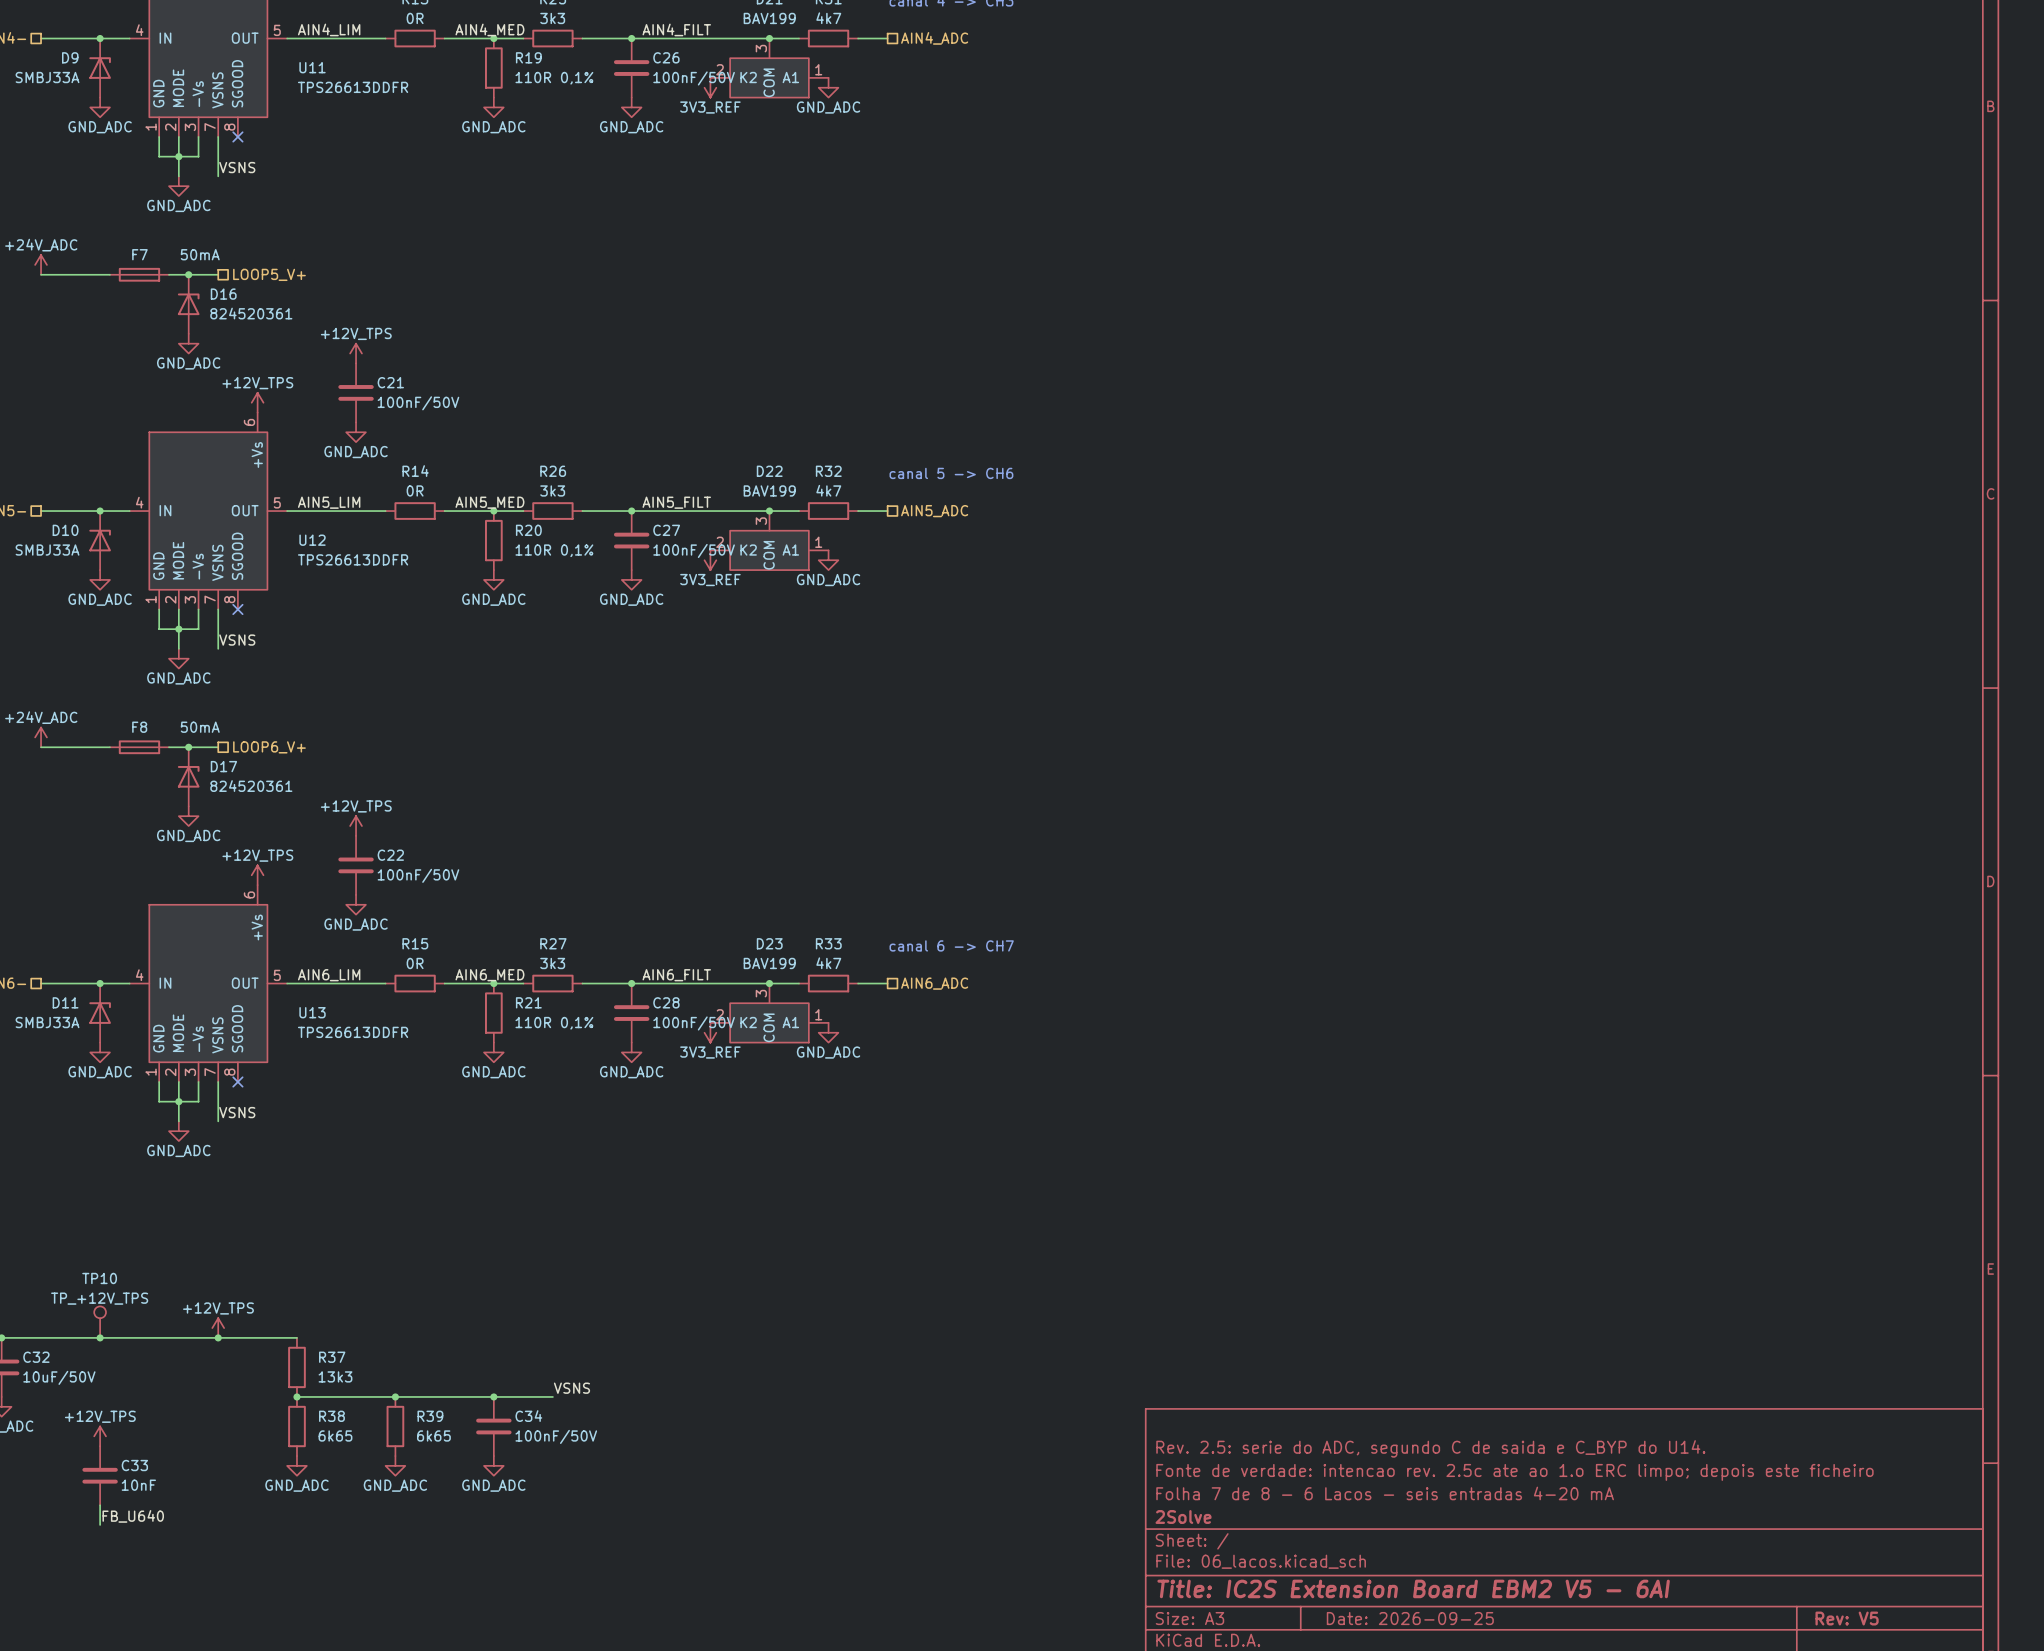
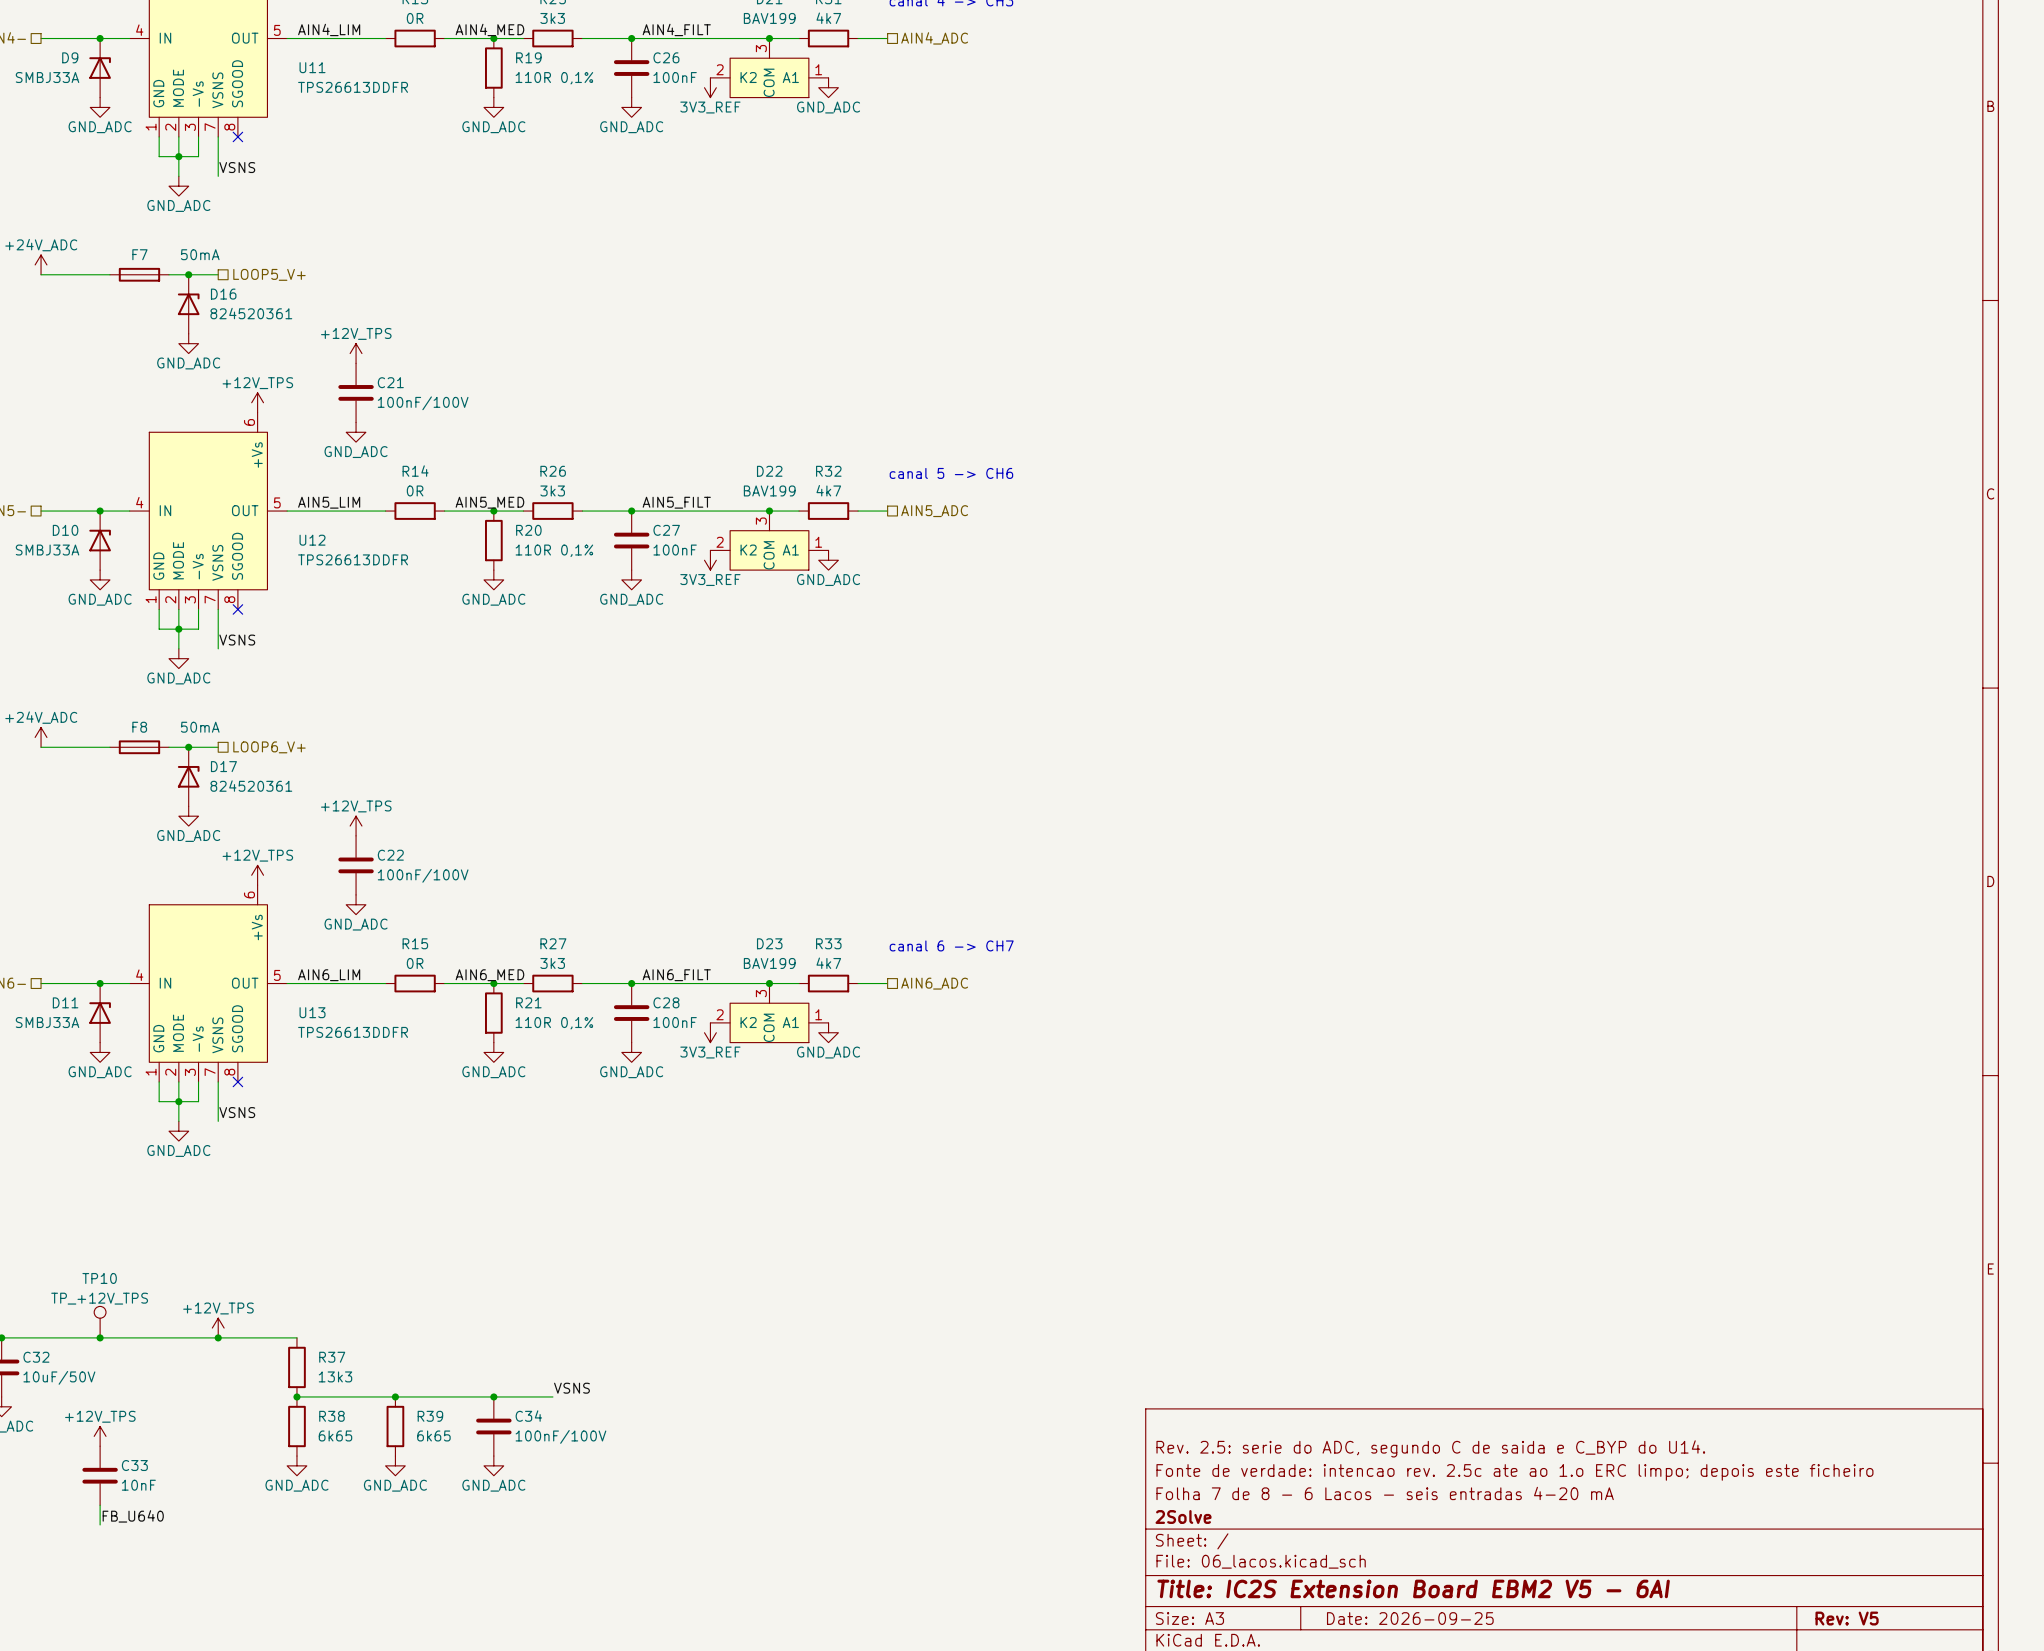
C26 value: 100nF/50V (694, 78) -> 100nF (675, 77)
C21 value: 100nF/50V (418, 403) -> 100nF/100V (423, 403)
C27 value: 100nF/50V (694, 550) -> 100nF (675, 550)
C22 value: 100nF/50V (418, 875) -> 100nF/100V (423, 875)
C28 value: 100nF/50V (694, 1023) -> 100nF (675, 1022)
C34 value: 100nF/50V (556, 1436) -> 100nF/100V (560, 1436)

